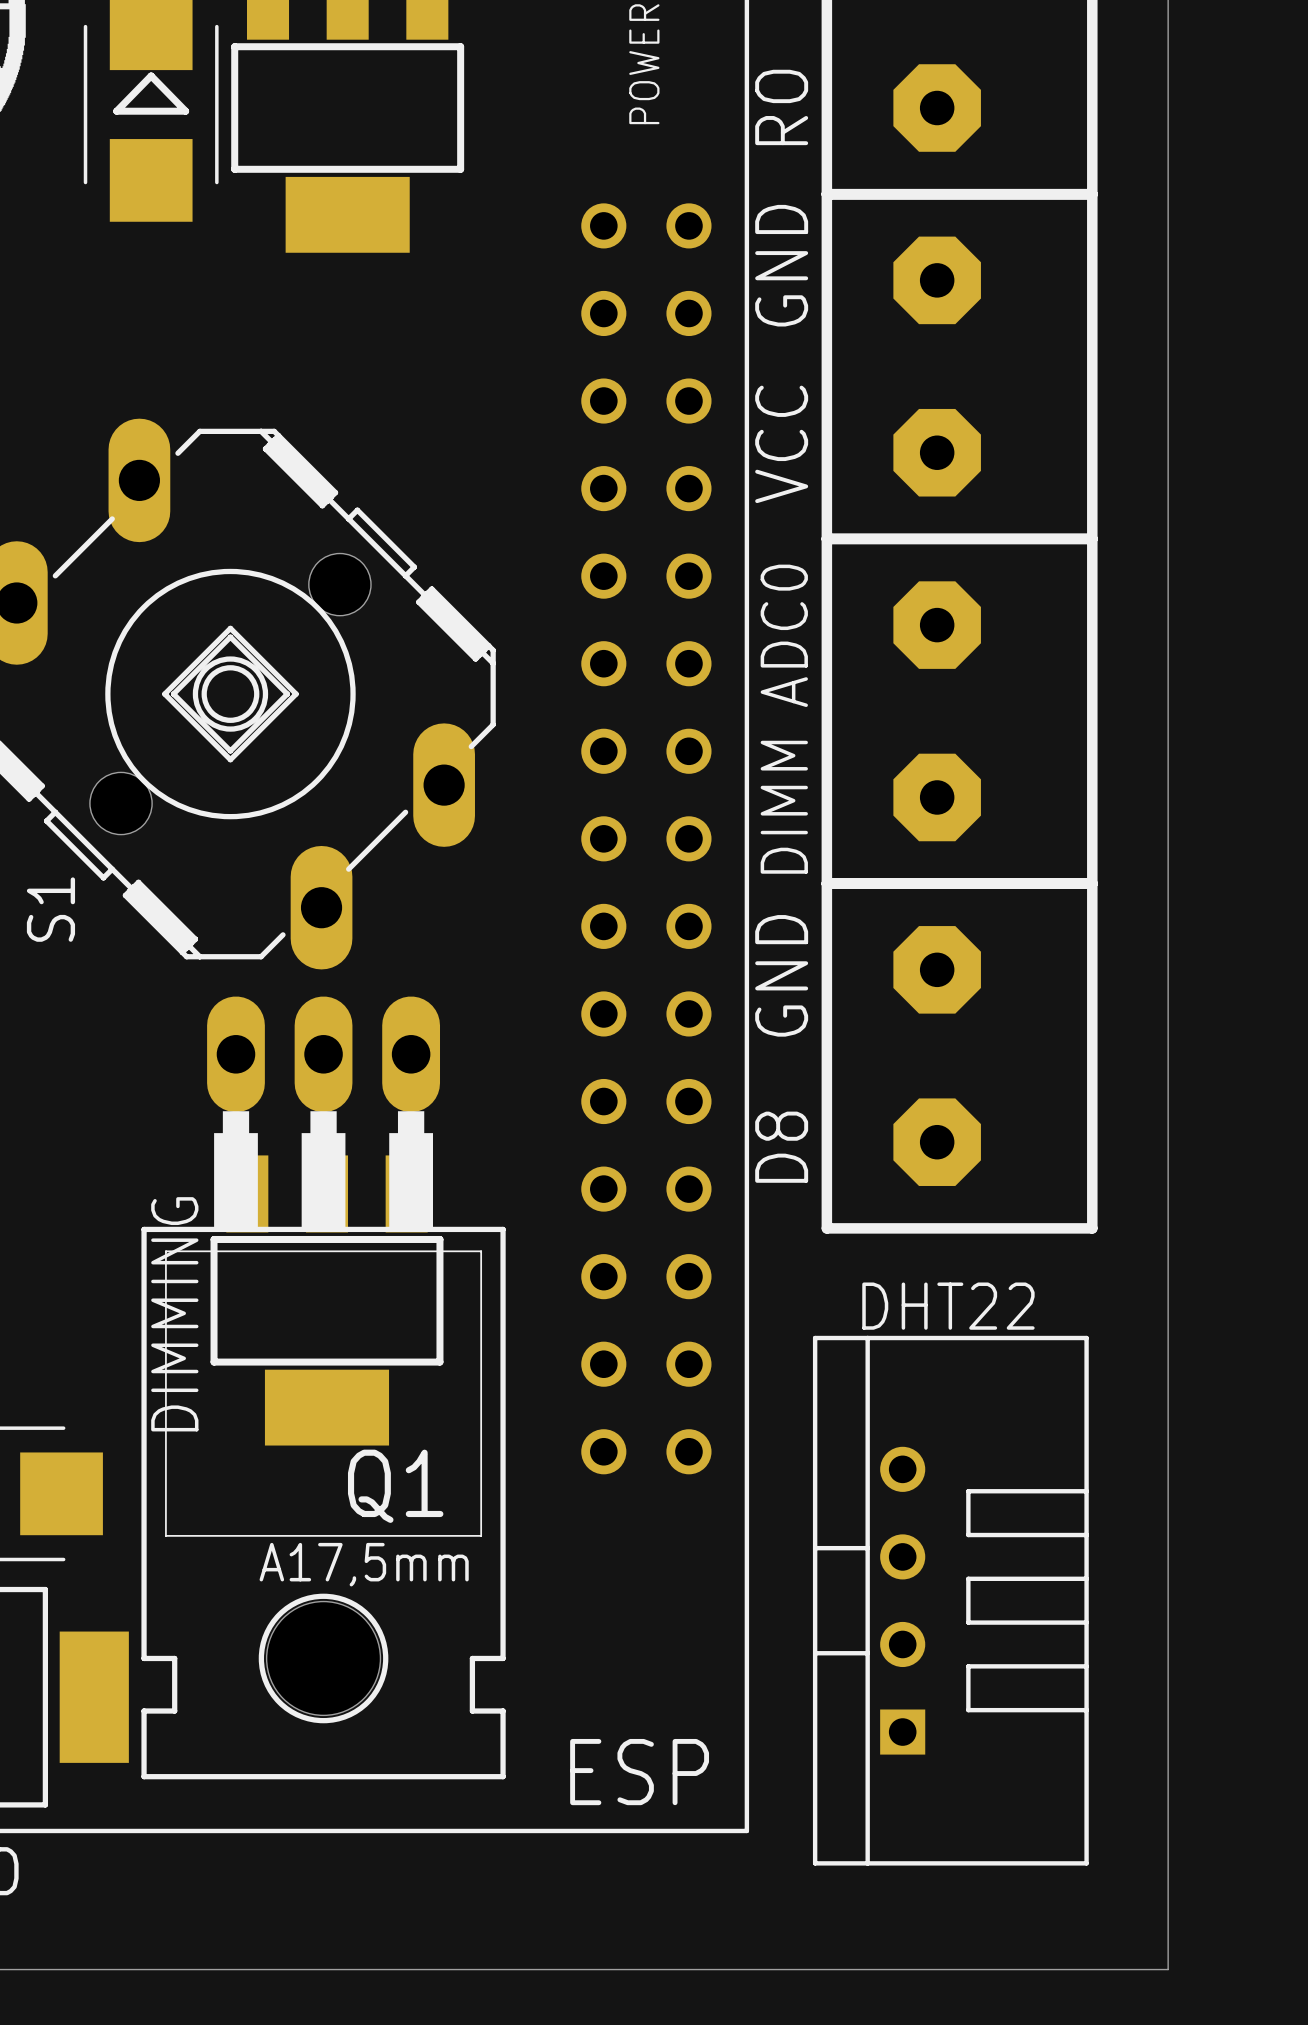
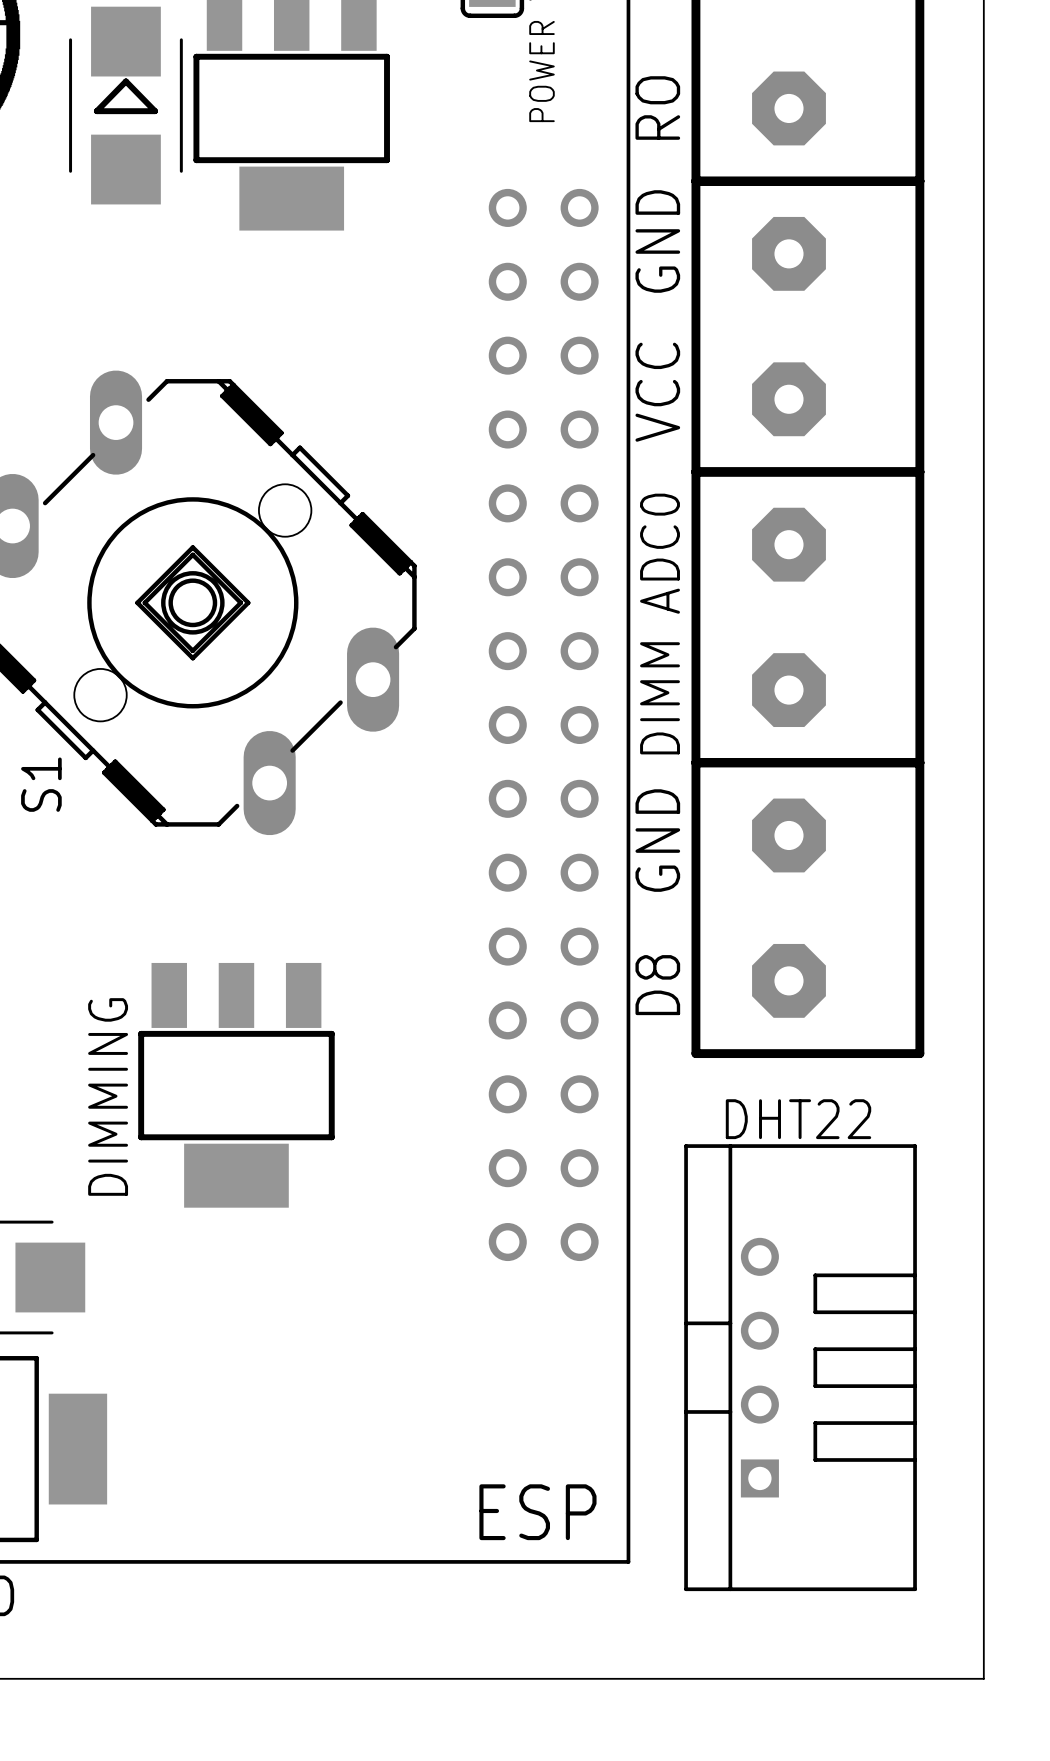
DIMMING position: (326, 1300) -> (236, 1085)
Q1: (323, 1387) -> none

